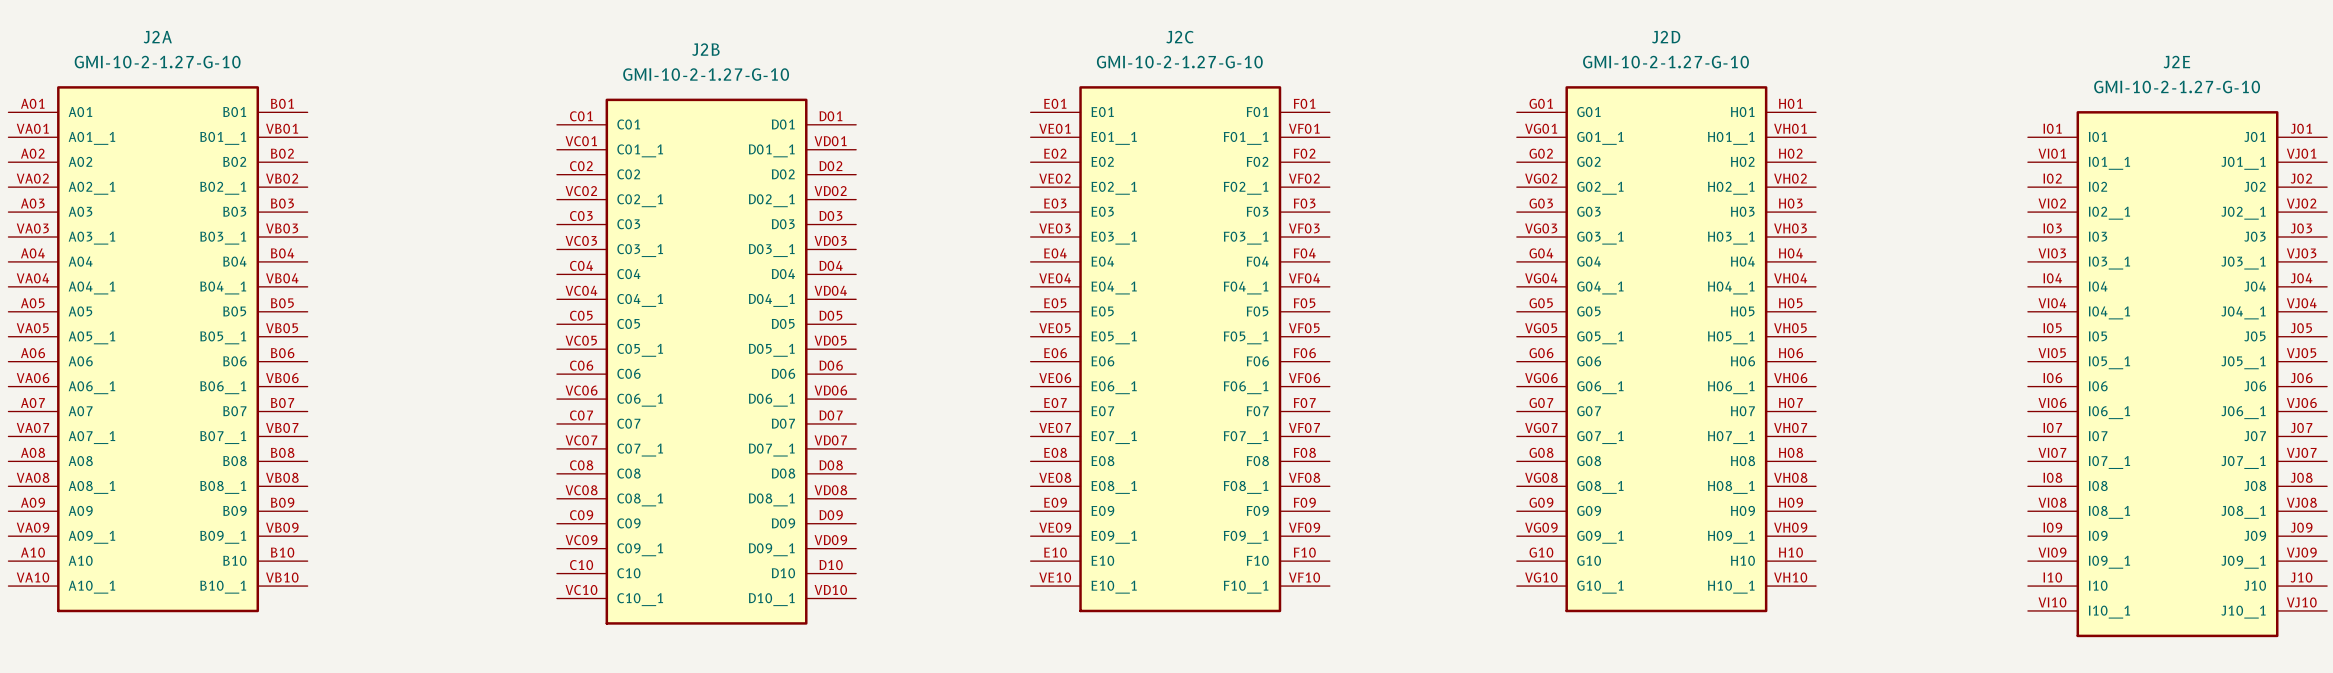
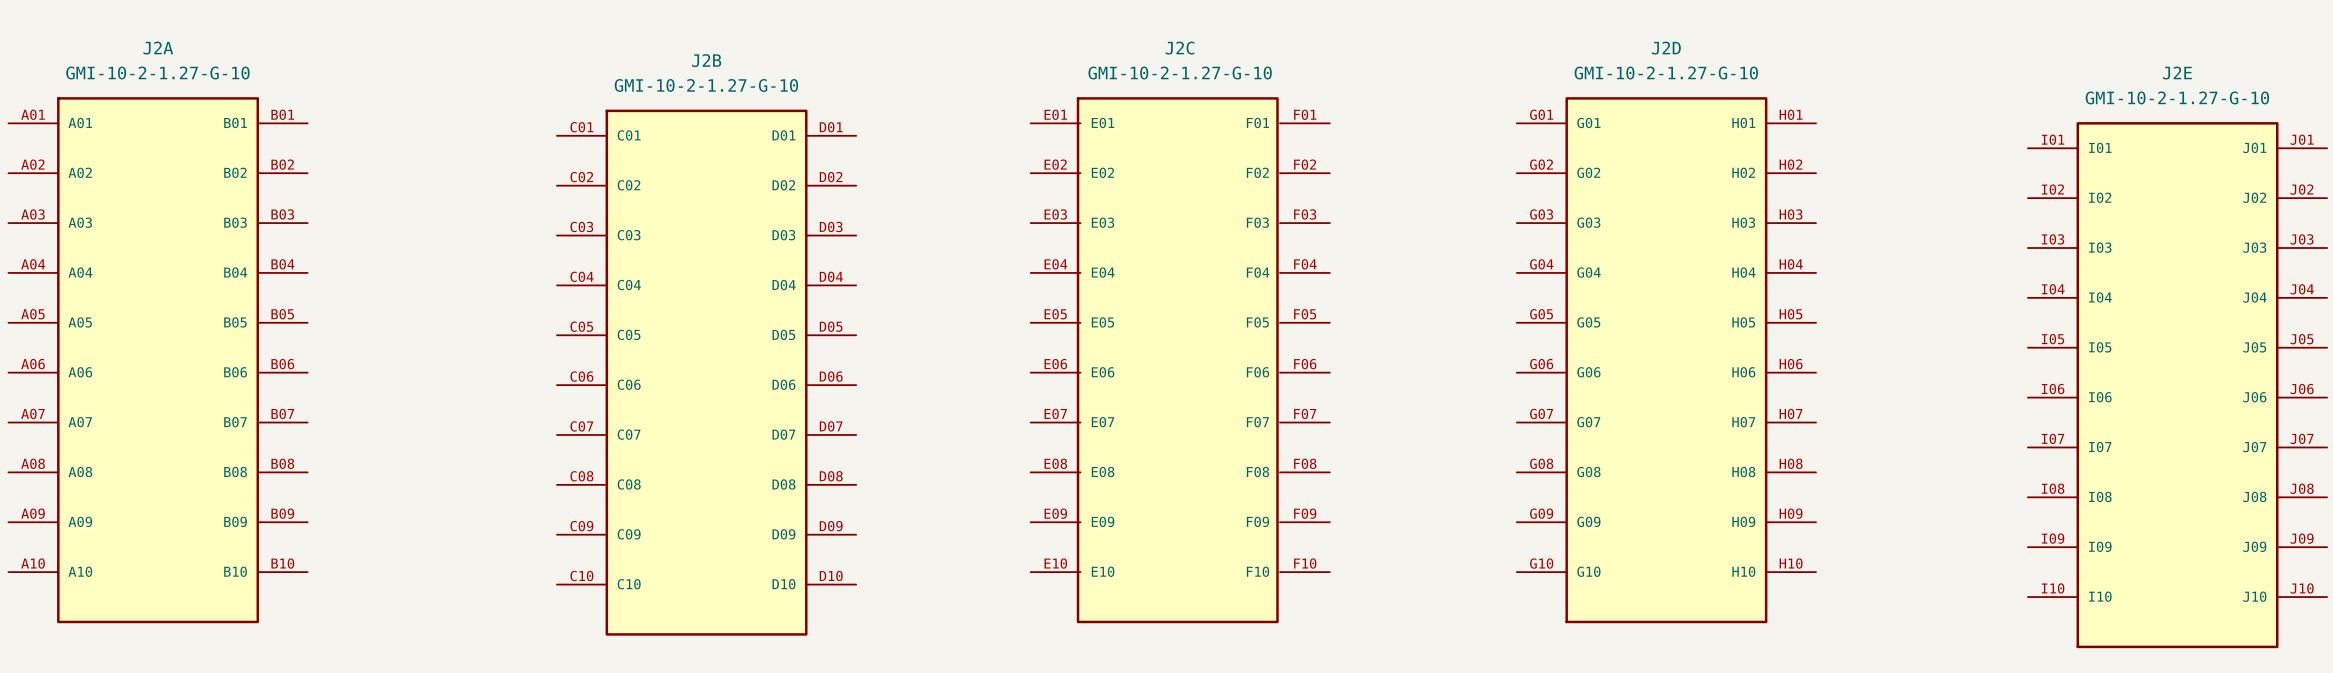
J2A symbol: [8, 86, 308, 613] -> [8, 97, 308, 624]
J2C symbol: [1030, 86, 1330, 613] -> [1030, 97, 1330, 624]
J2D symbol: [1516, 86, 1817, 613] -> [1516, 97, 1817, 624]
J2B symbol: [556, 98, 857, 625] -> [556, 109, 857, 636]
J2E symbol: [2027, 111, 2328, 638] -> [2027, 122, 2328, 649]

